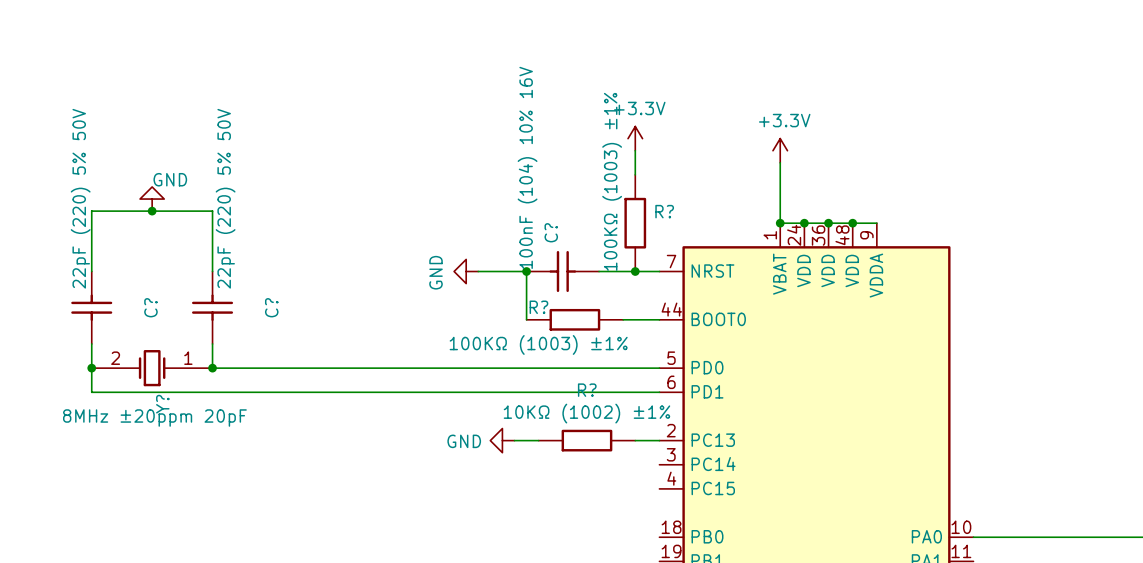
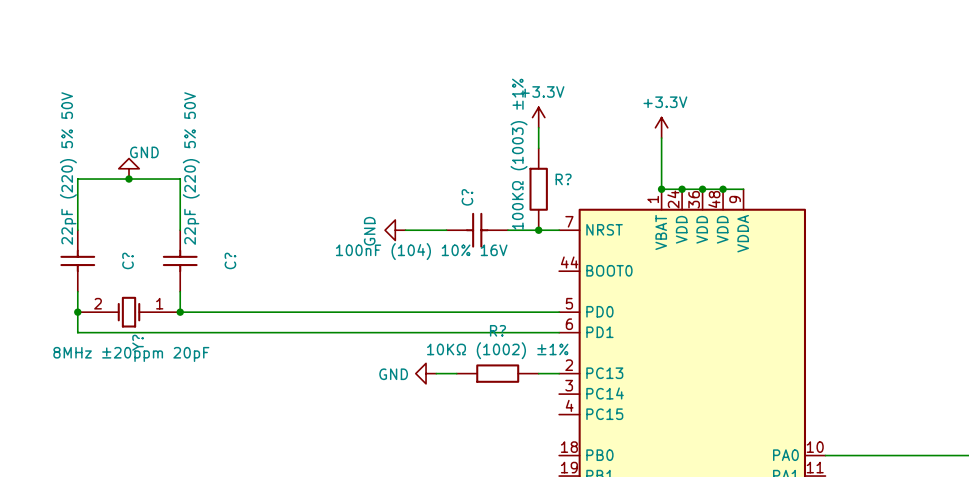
C? text rotation: 0° (527, 167) -> 90° clockwise (421, 251)
wire: (526, 271) (526, 319) -> none
junction: (526, 271) -> none
R?: (574, 319) -> none
wire: (623, 319) (659, 319) -> none

